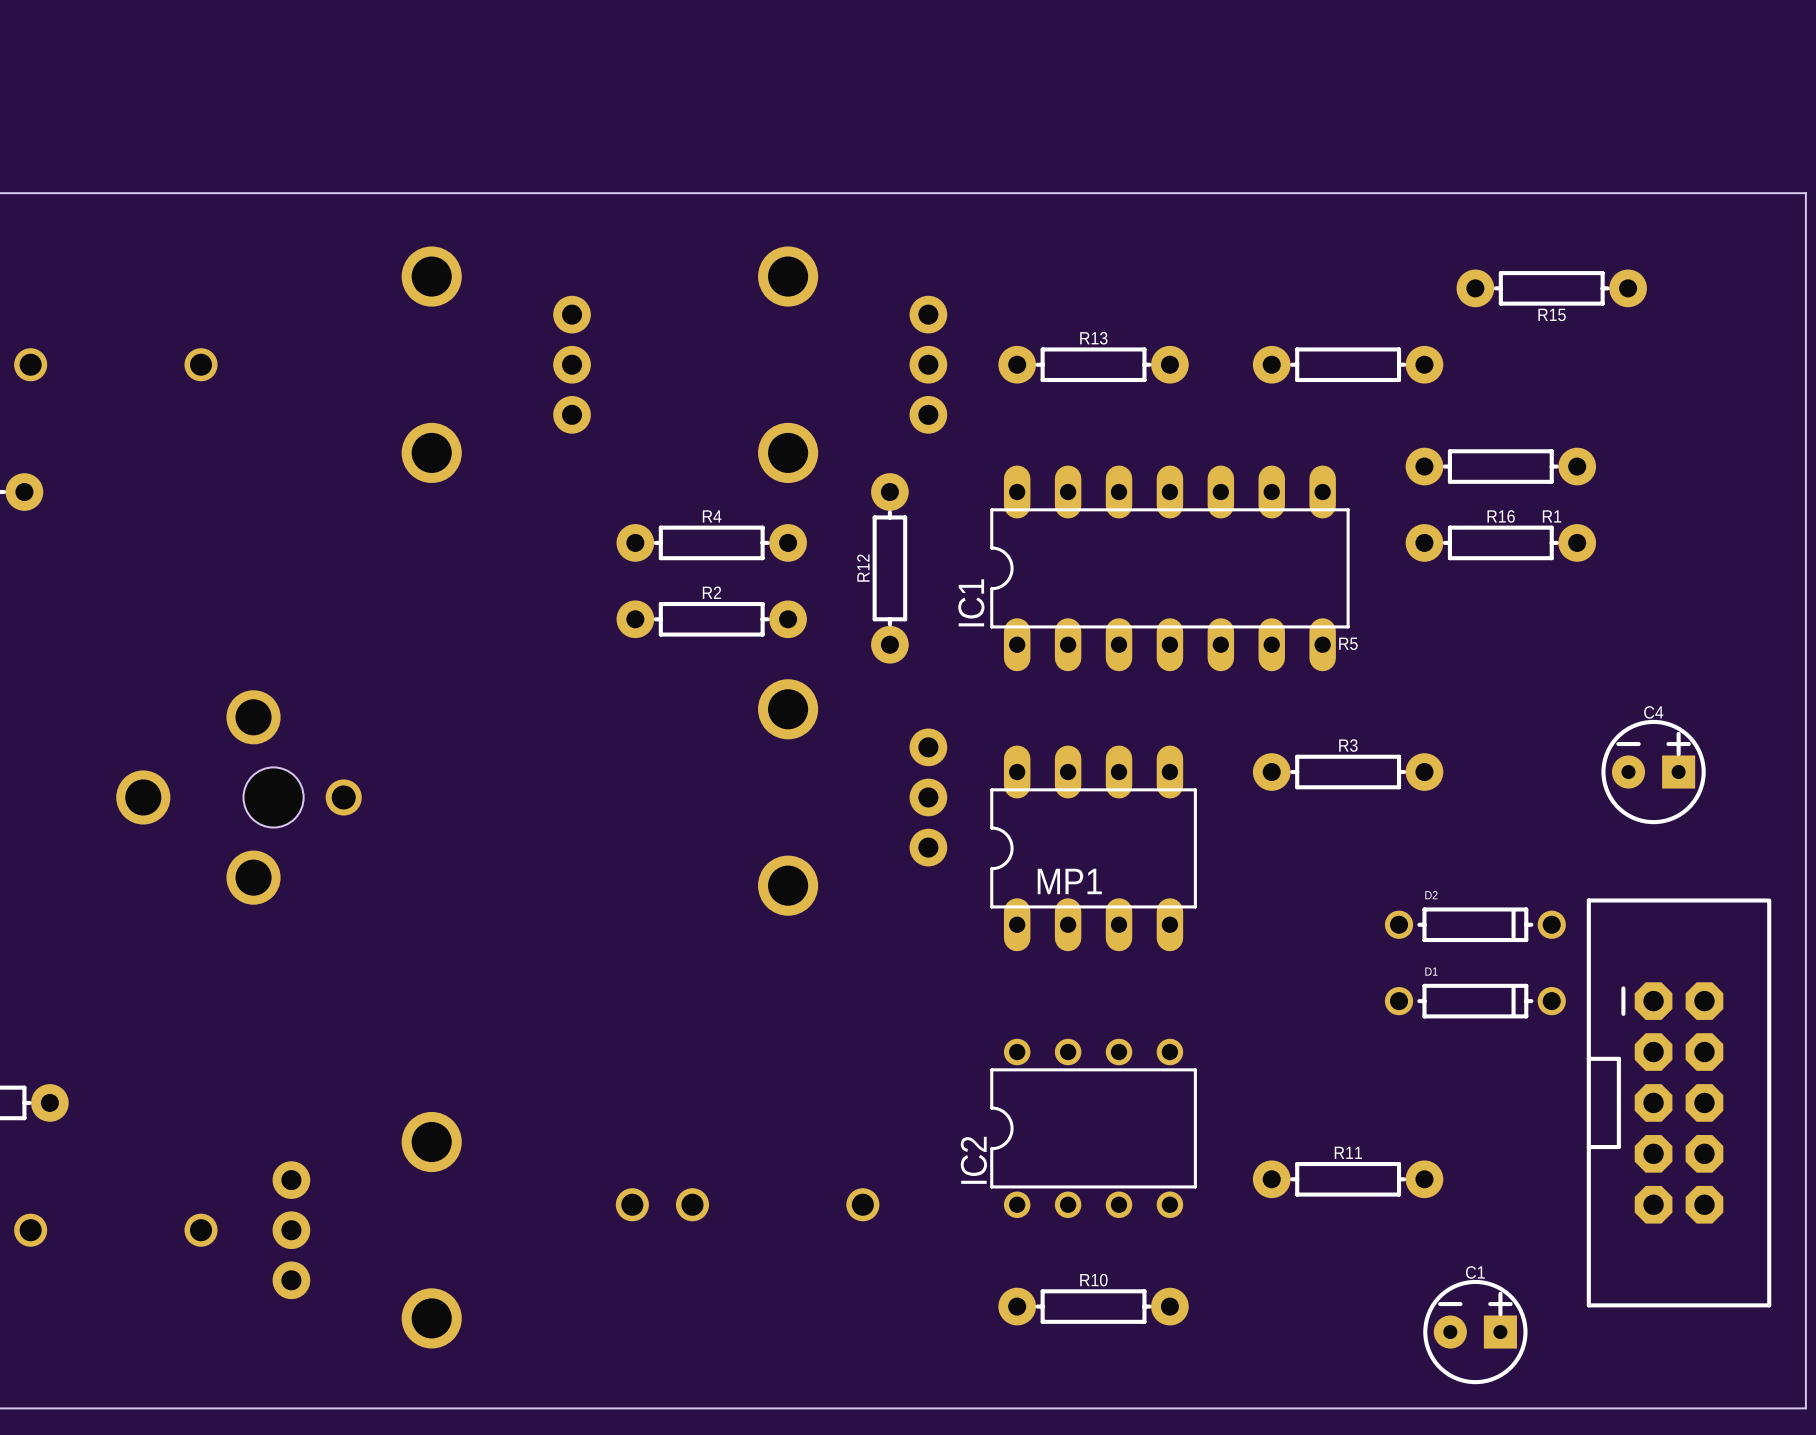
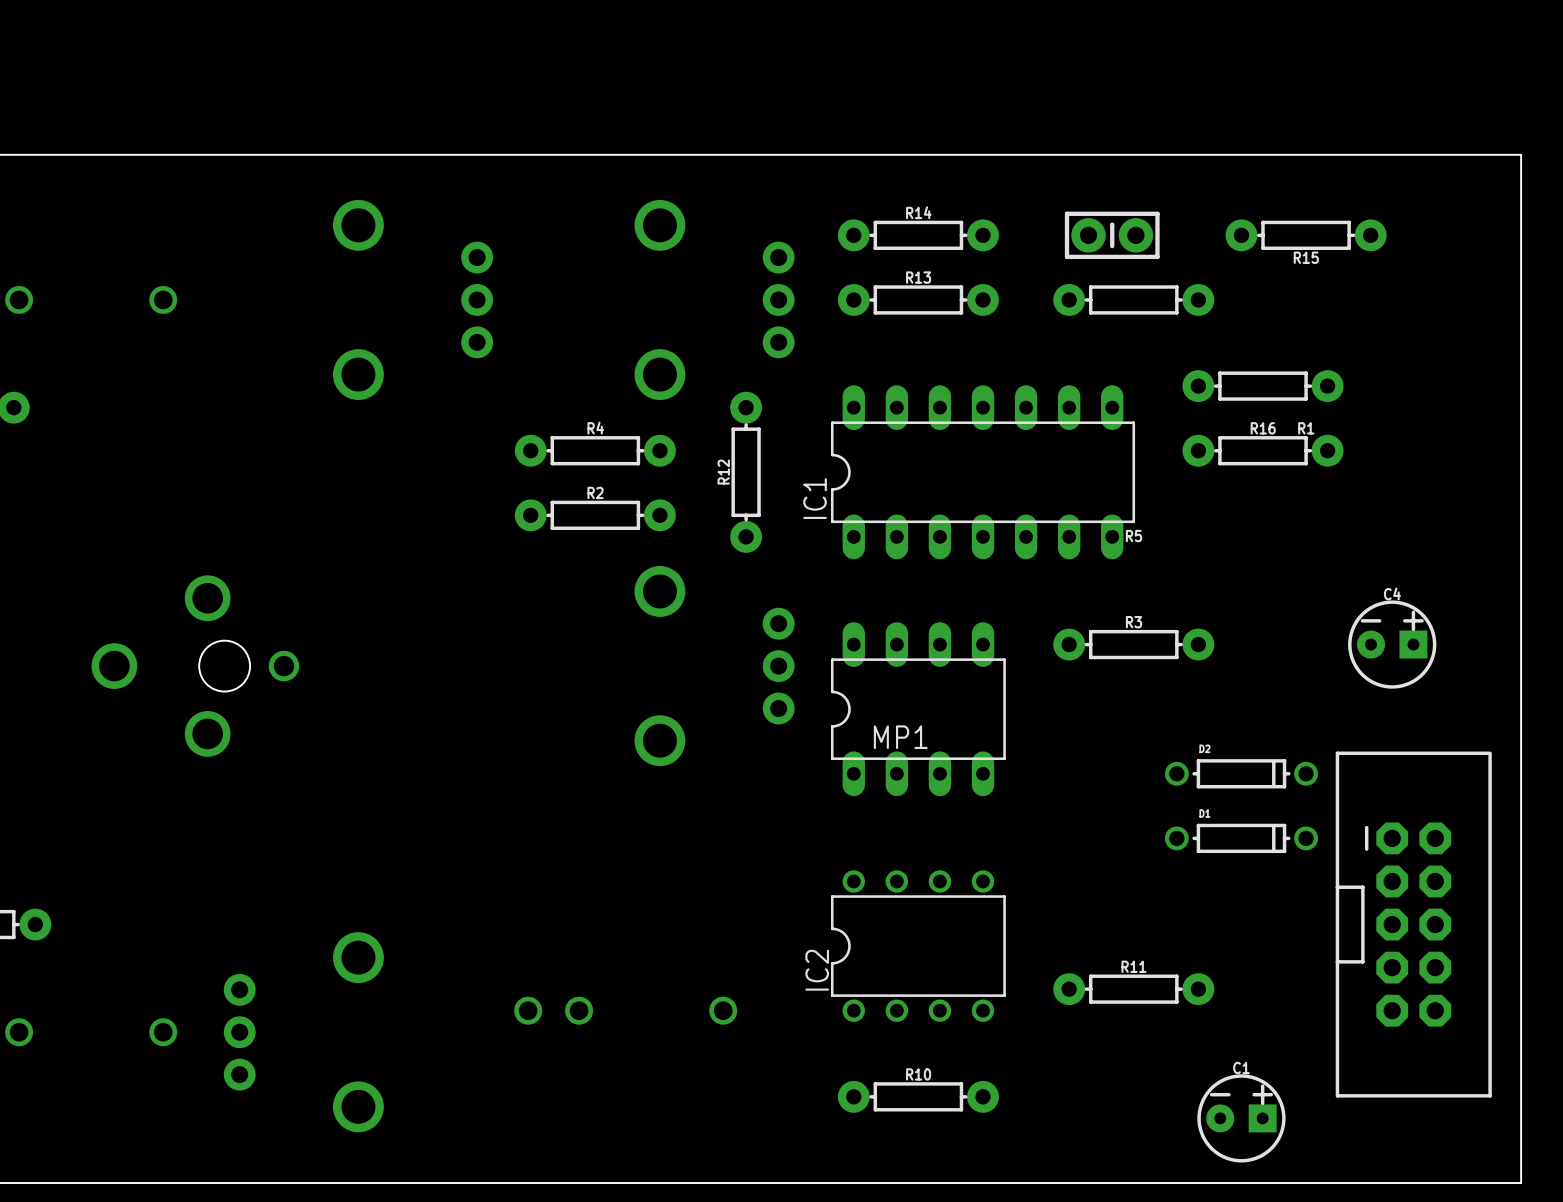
R14: none -> (918, 235)
part: none -> (1112, 235)

